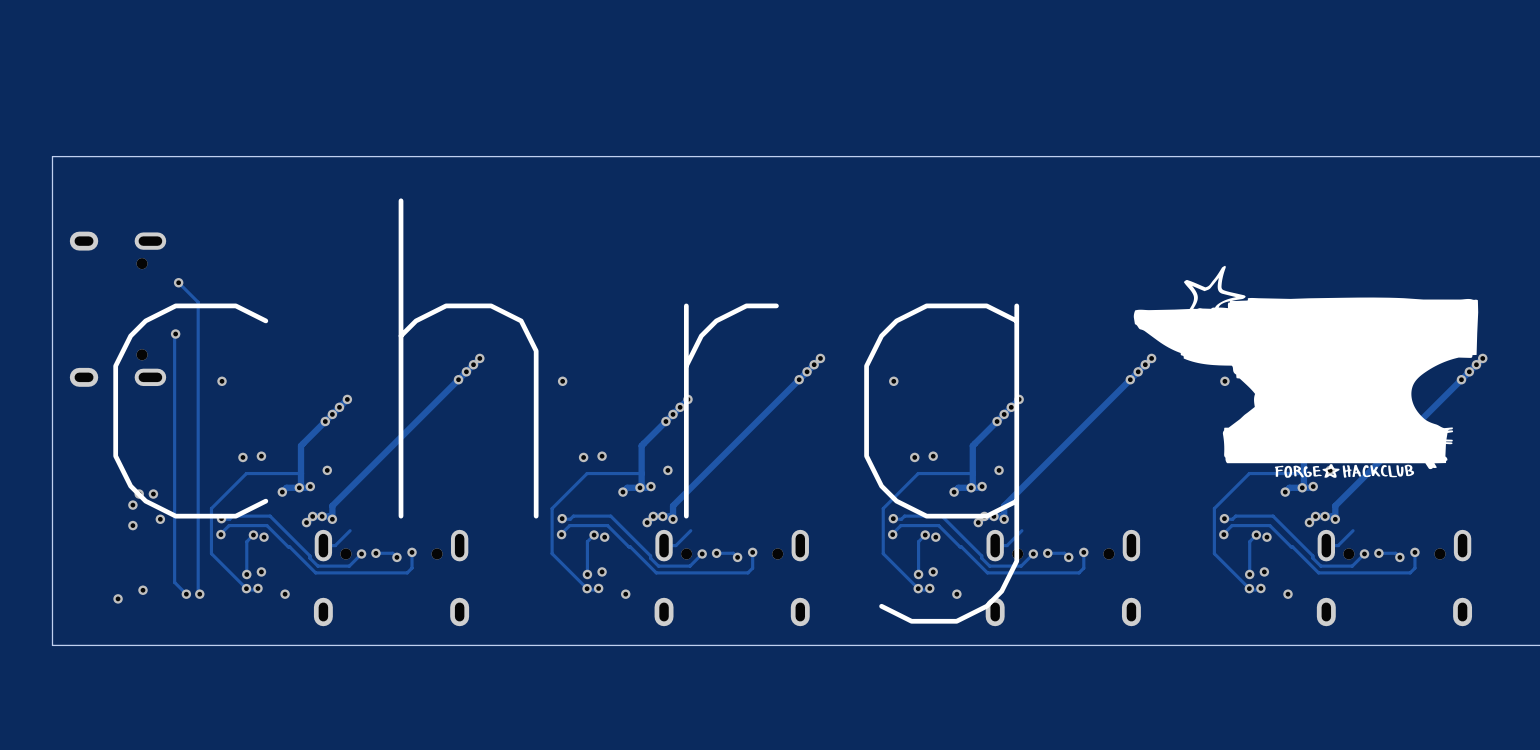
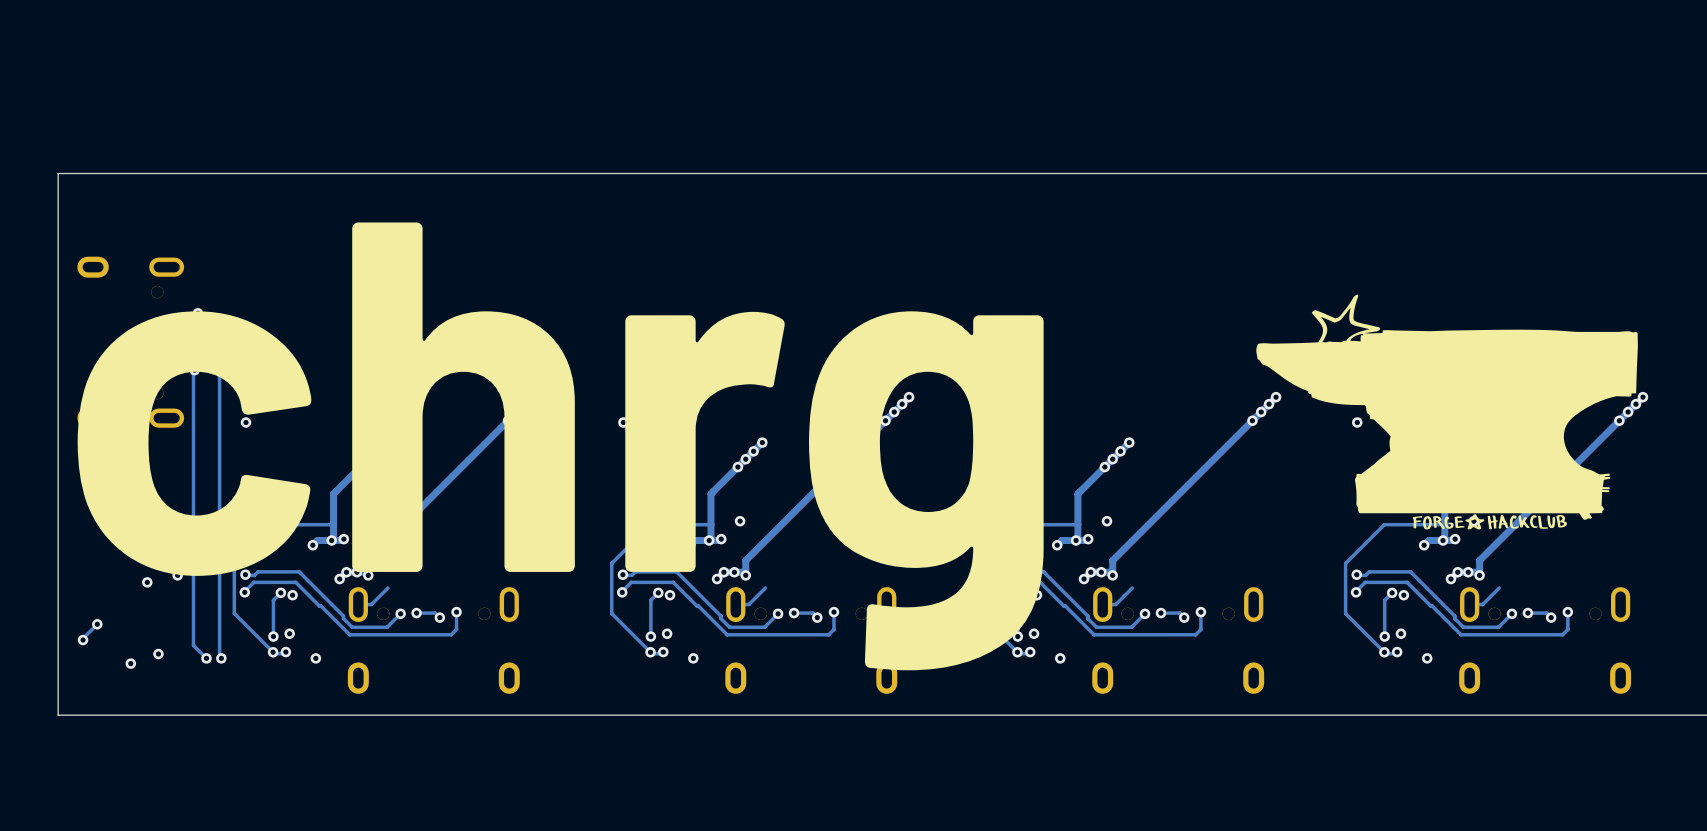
track: none -> (97, 624) (83, 640)
via: none -> (97, 624)
via: none -> (83, 640)

